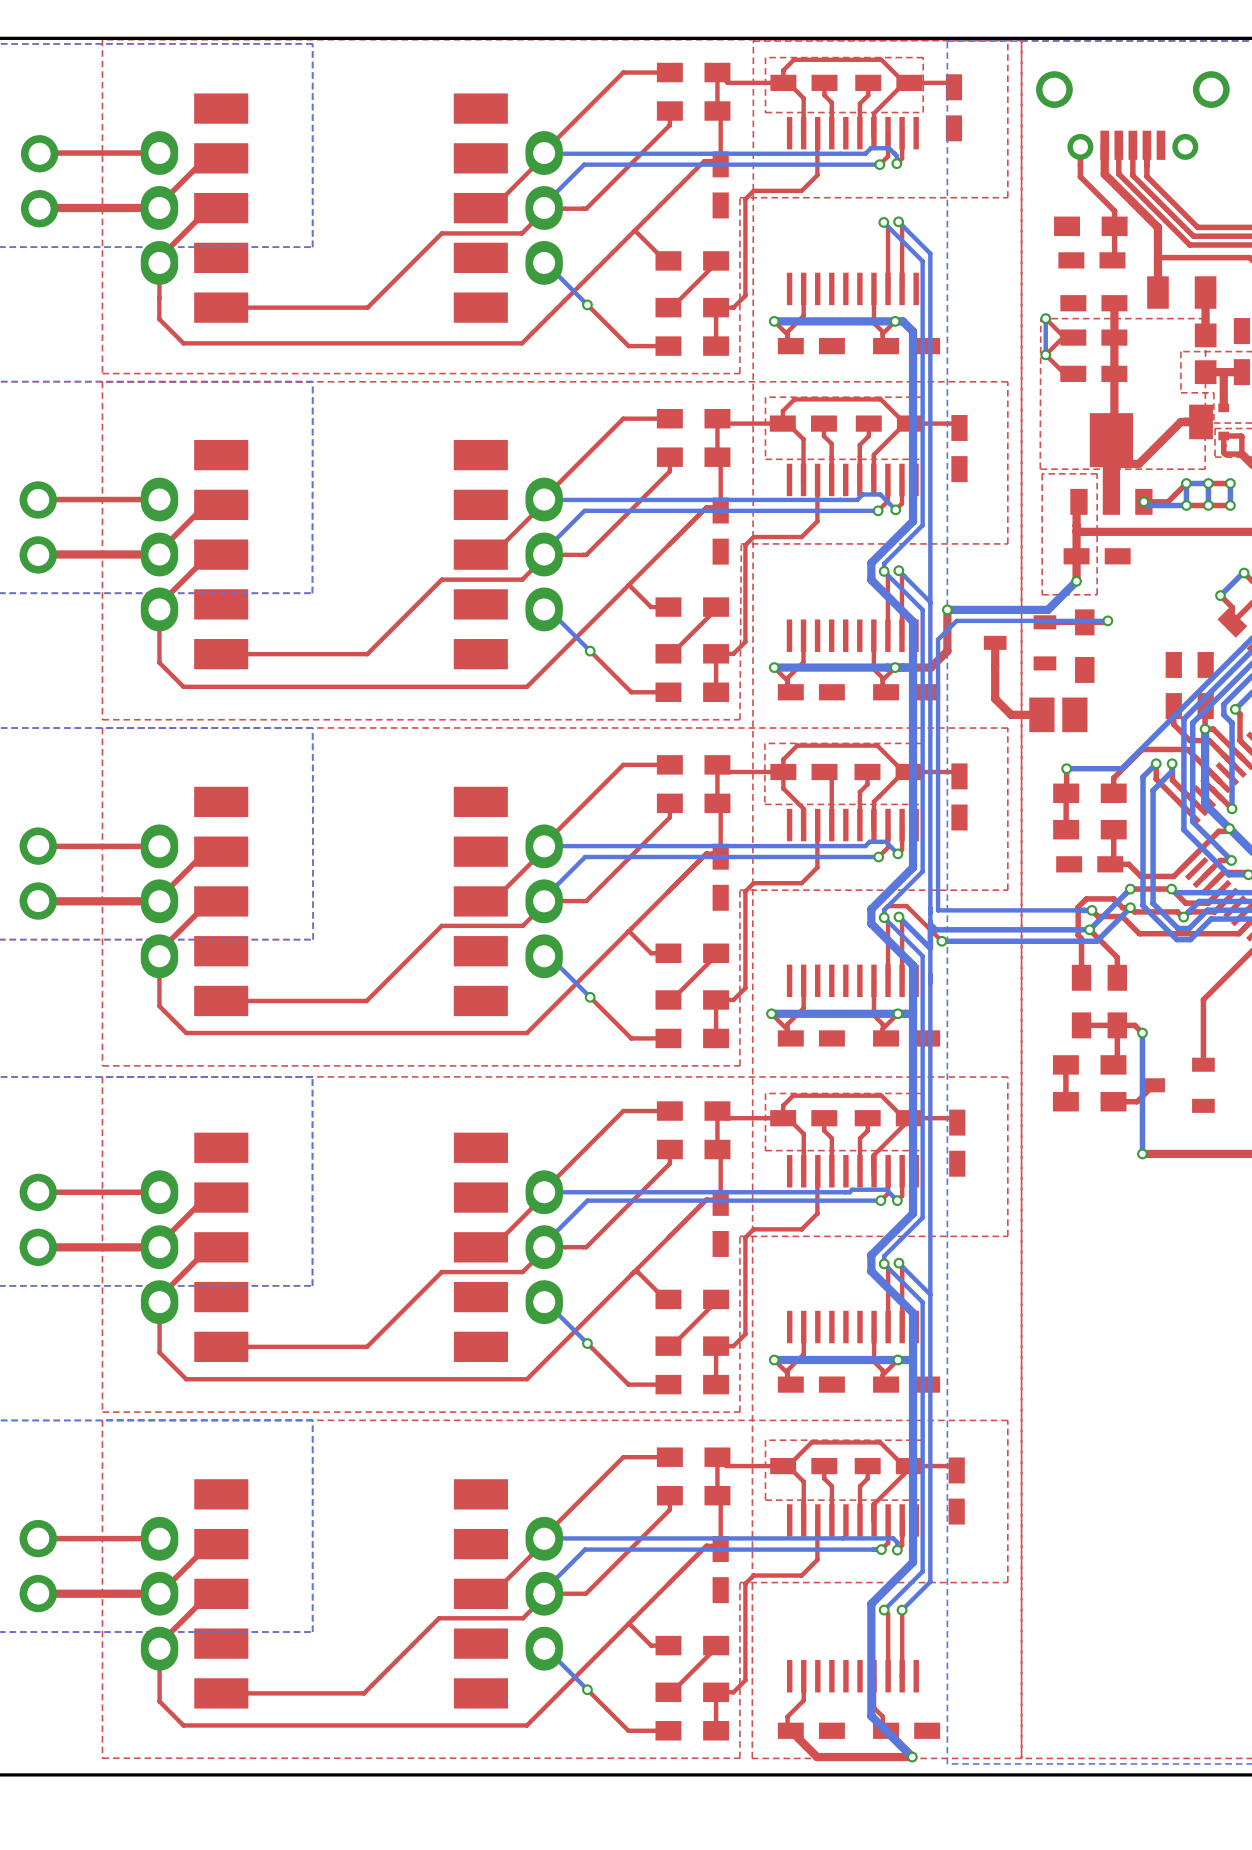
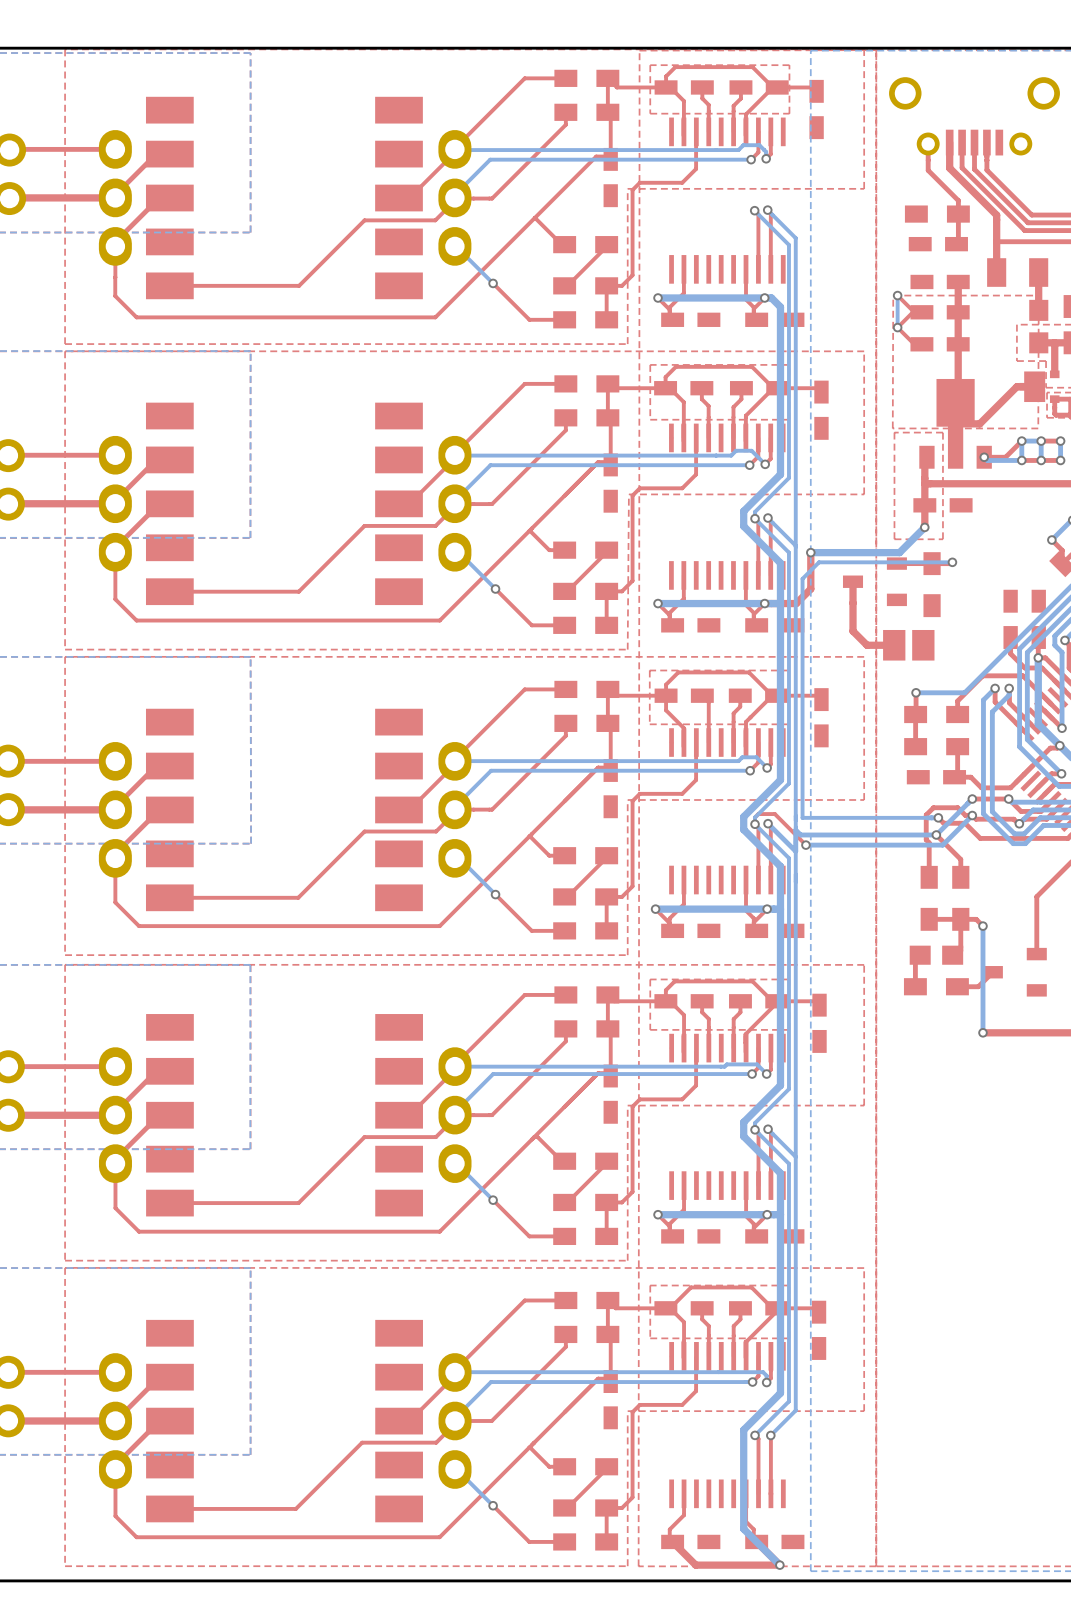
part footprint: [1052, 1055, 1127, 1075] -> [909, 945, 964, 965]

